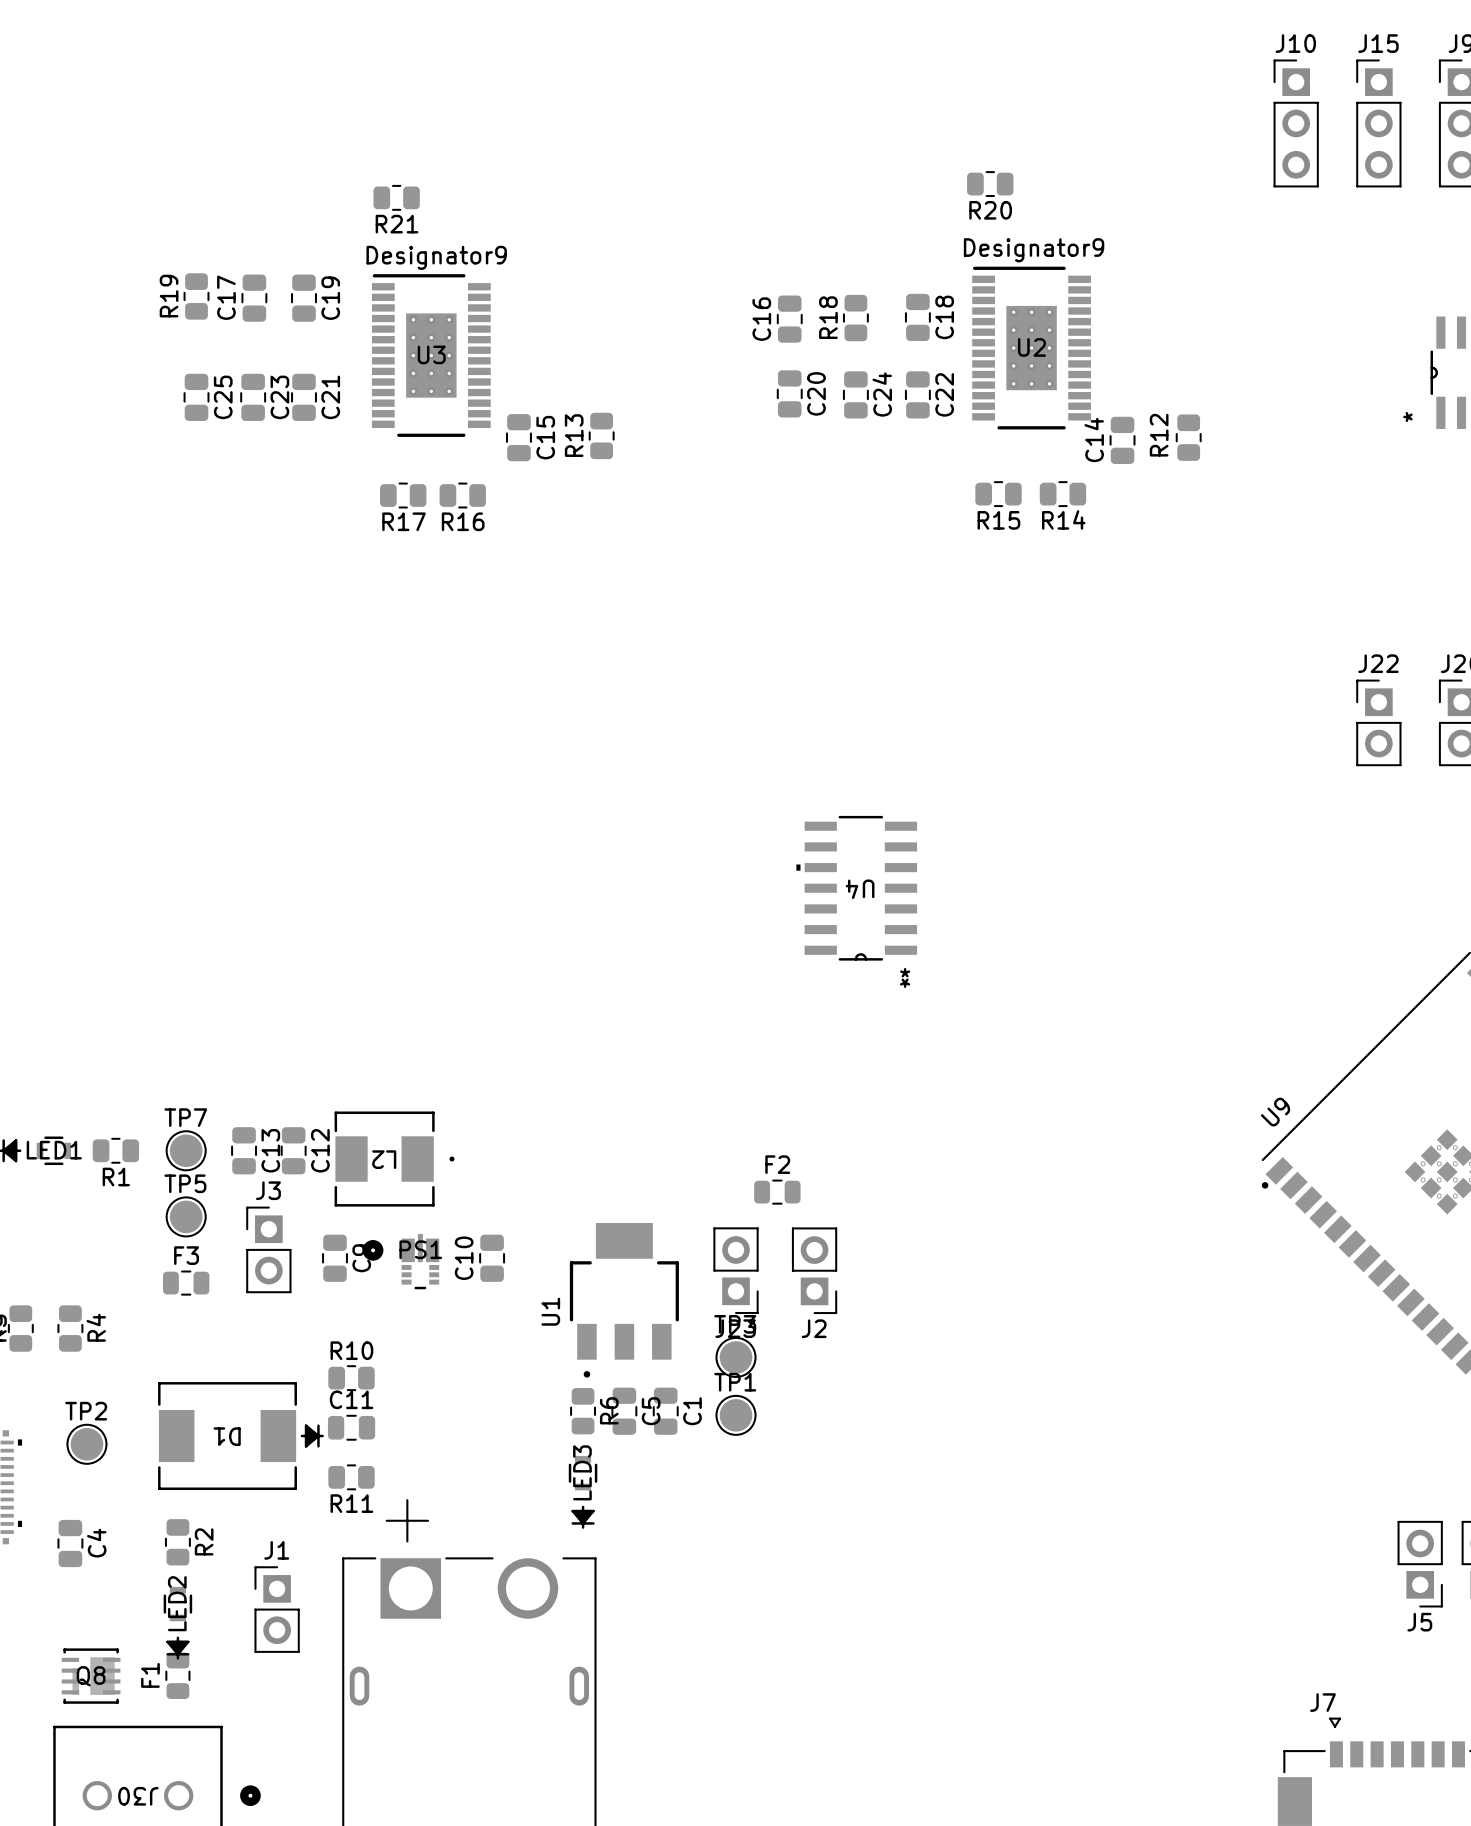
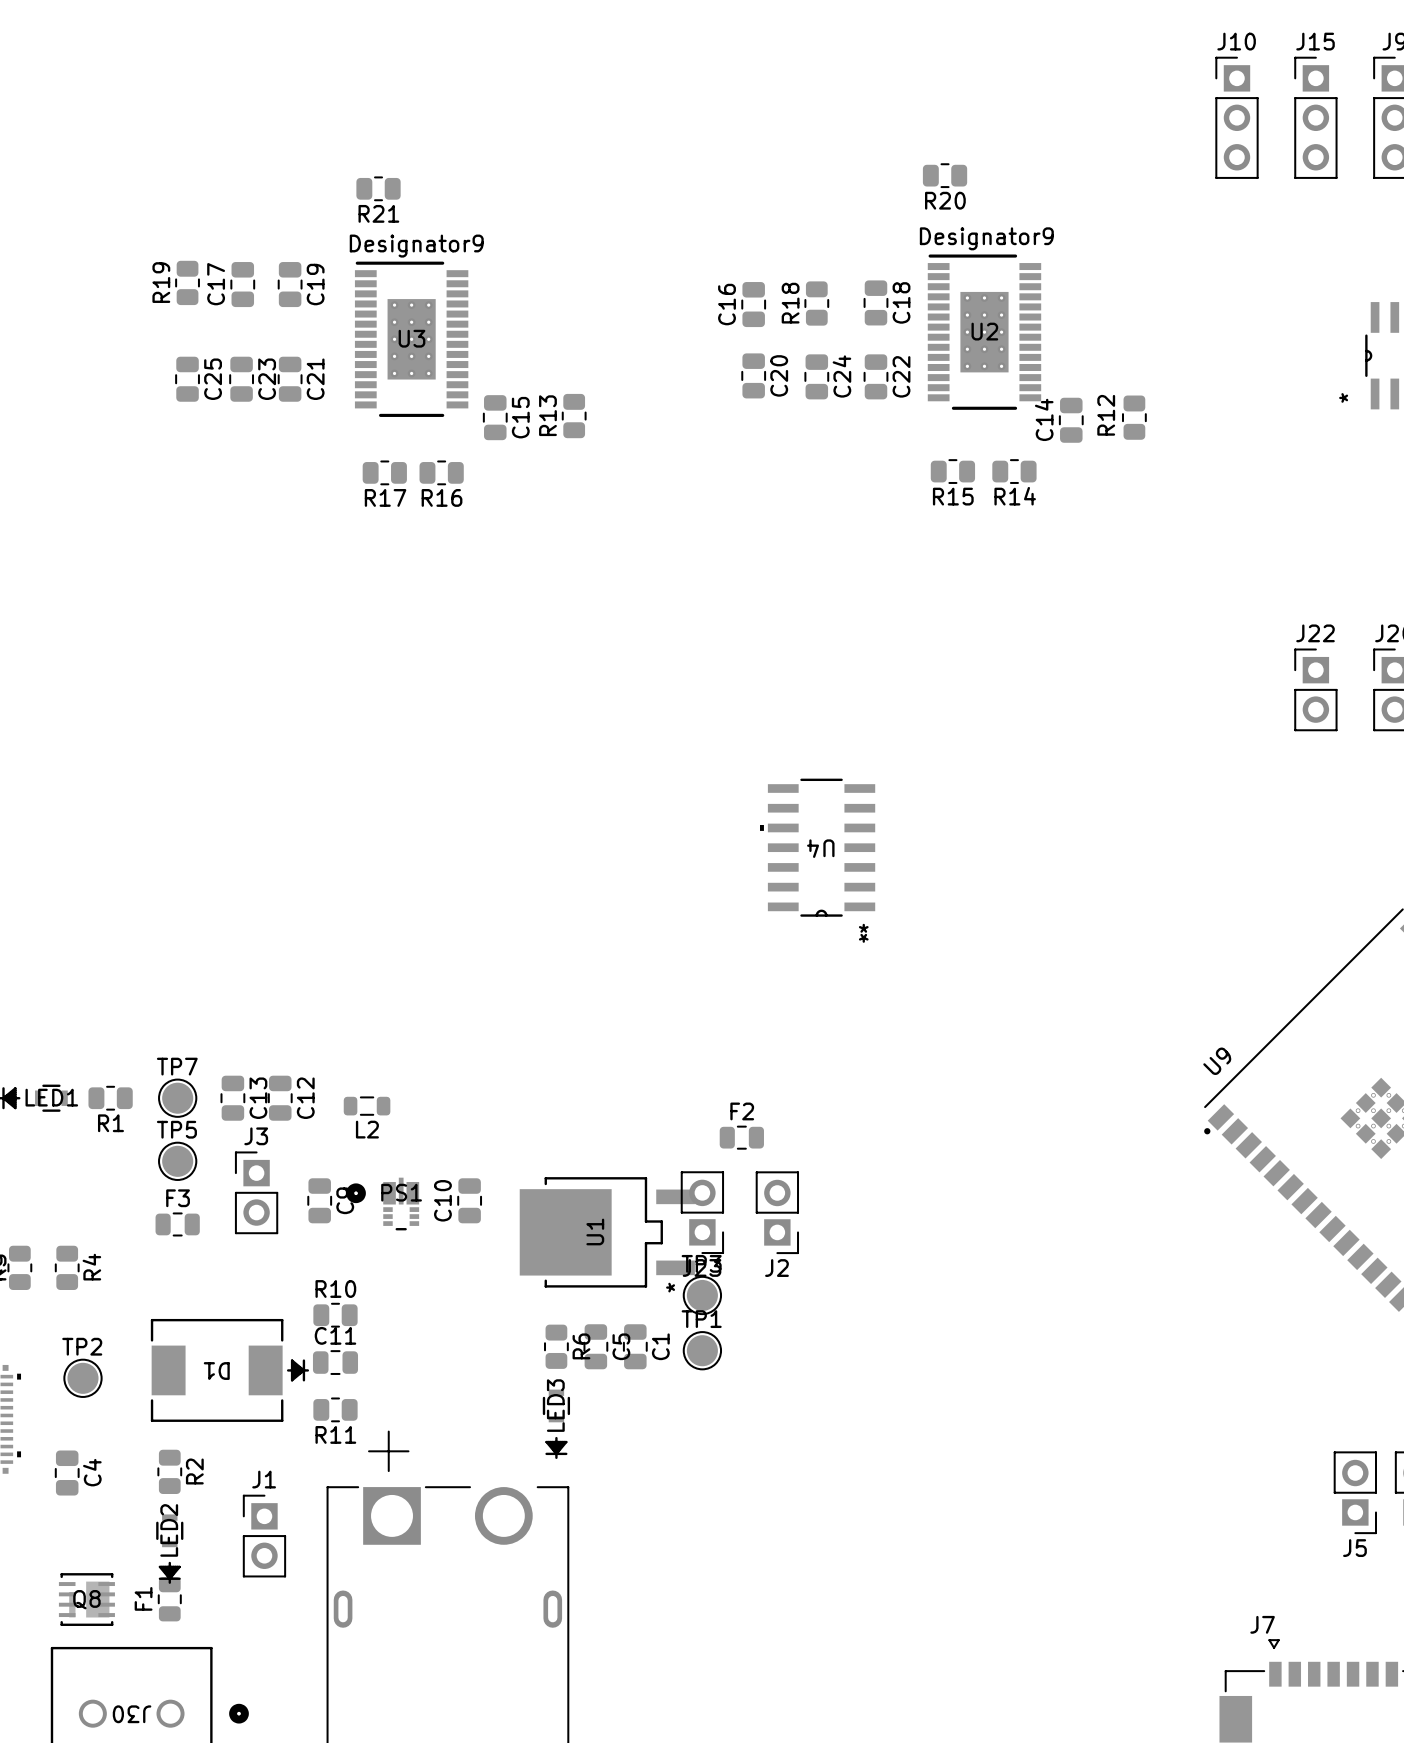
L2 footprint: [334, 1111, 455, 1207] -> [343, 1096, 391, 1116]
U1 footprint: [569, 1222, 679, 1378] -> [519, 1177, 695, 1288]
U1 name position: U1 (550, 1311) -> U1 (595, 1231)

